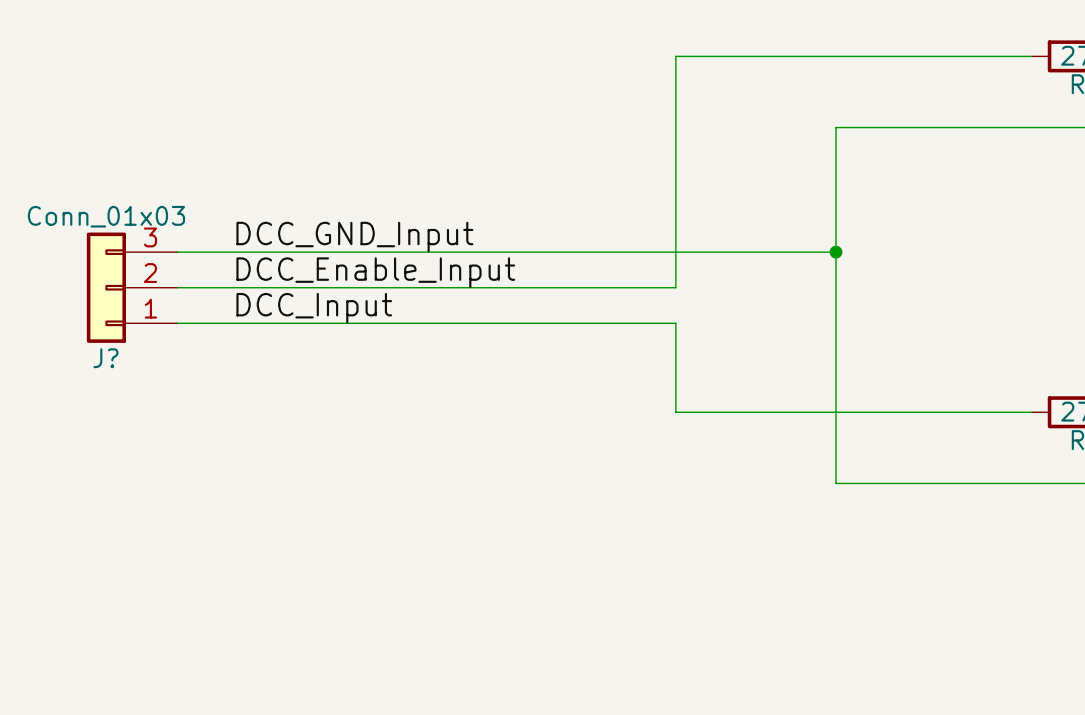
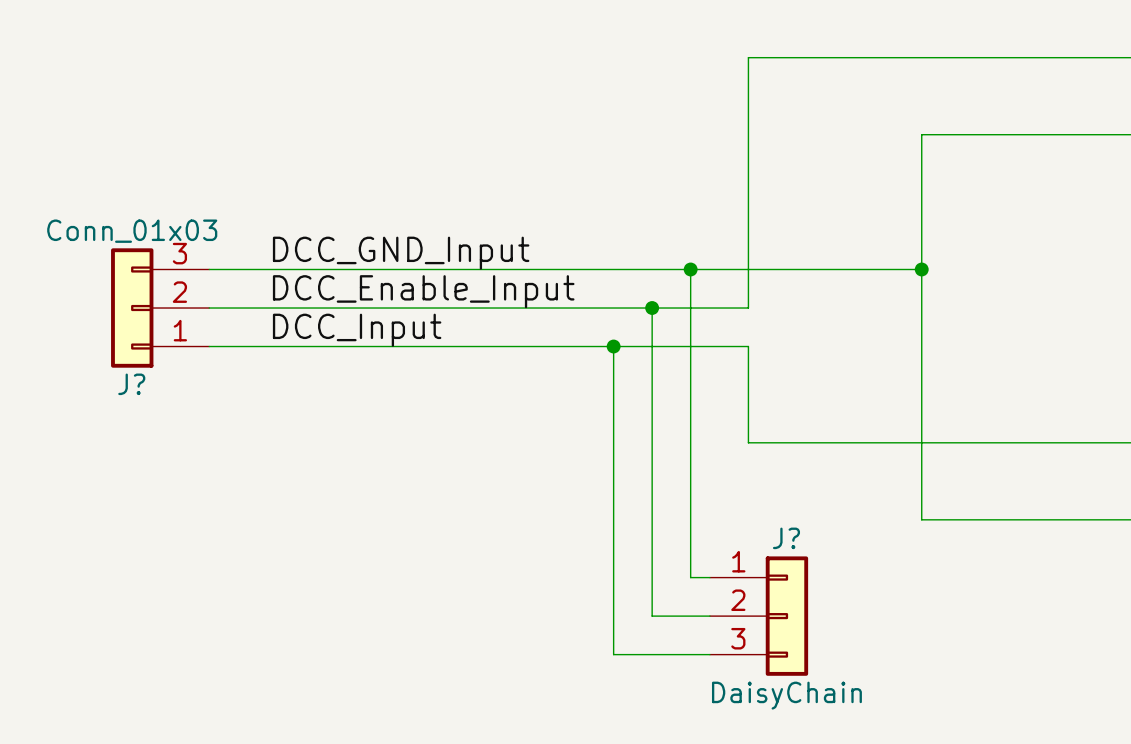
wire: none -> (690, 269) (690, 577) (709, 577)
junction: none -> (690, 269)
wire: none -> (652, 308) (652, 616) (709, 616)
junction: none -> (652, 308)
wire: none -> (613, 346) (613, 654) (709, 654)
junction: none -> (613, 346)
J?: none -> DaisyChain (759, 616)

